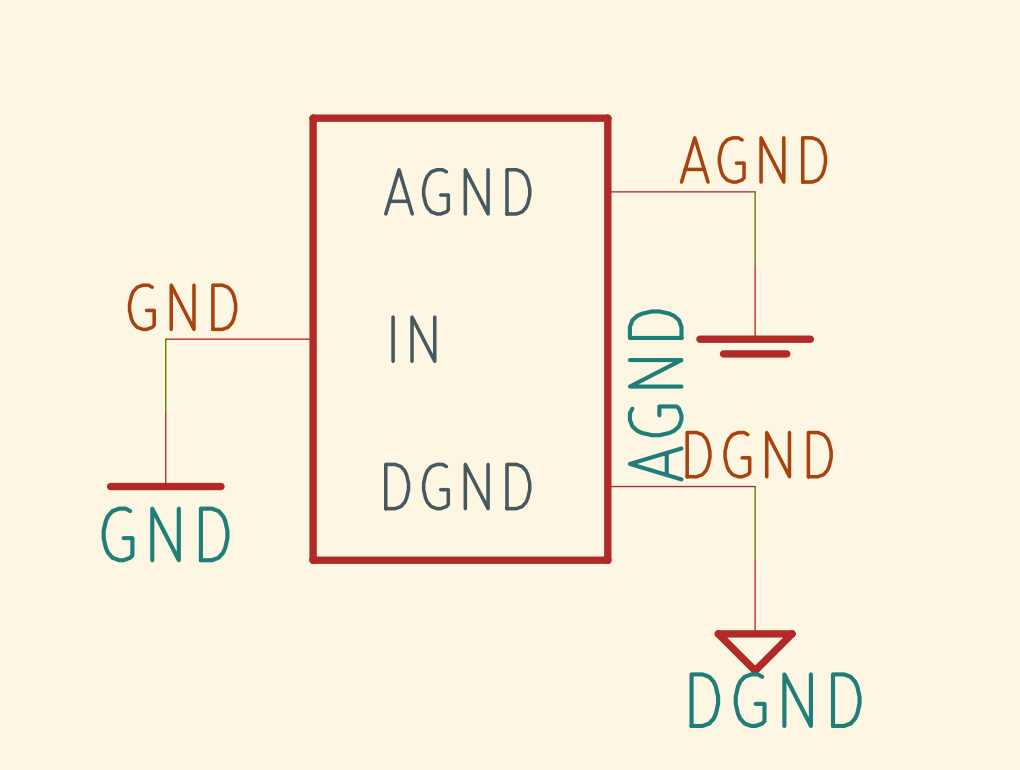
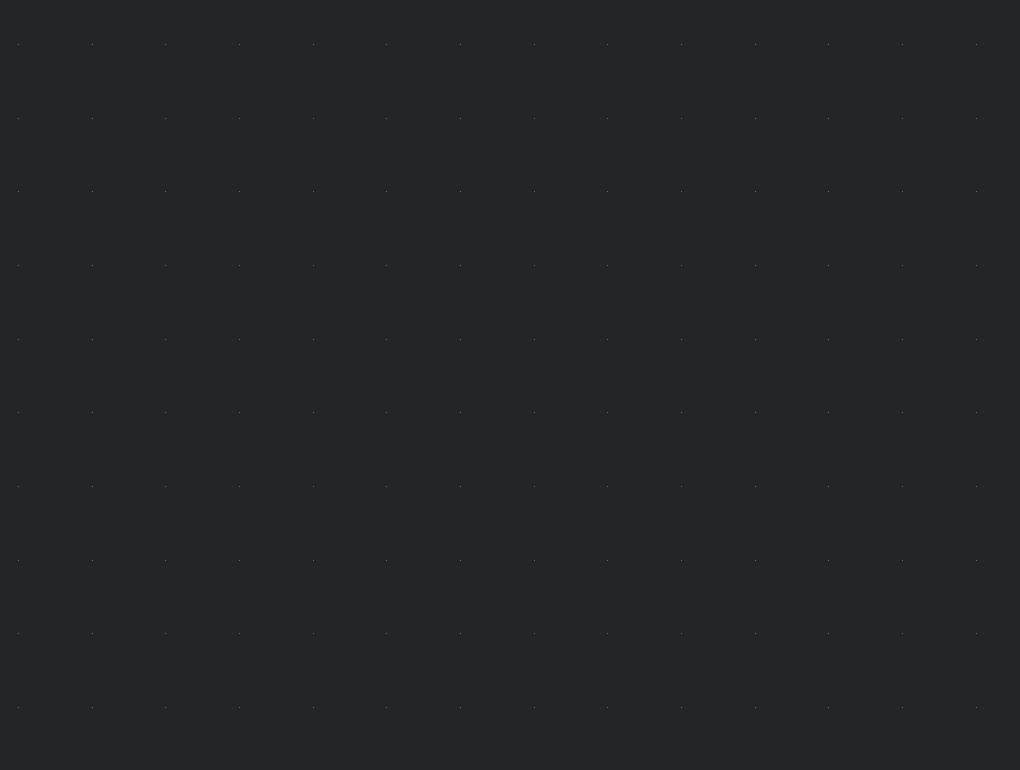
wire: (755, 191) (755, 265) -> none
power symbol: AGND (755, 311) -> none
wire: (165, 339) (165, 412) -> none
part: (460, 339) -> none
power symbol: GND (165, 451) -> none
wire: (755, 486) (755, 560) -> none
power symbol: DGND (755, 617) -> none

